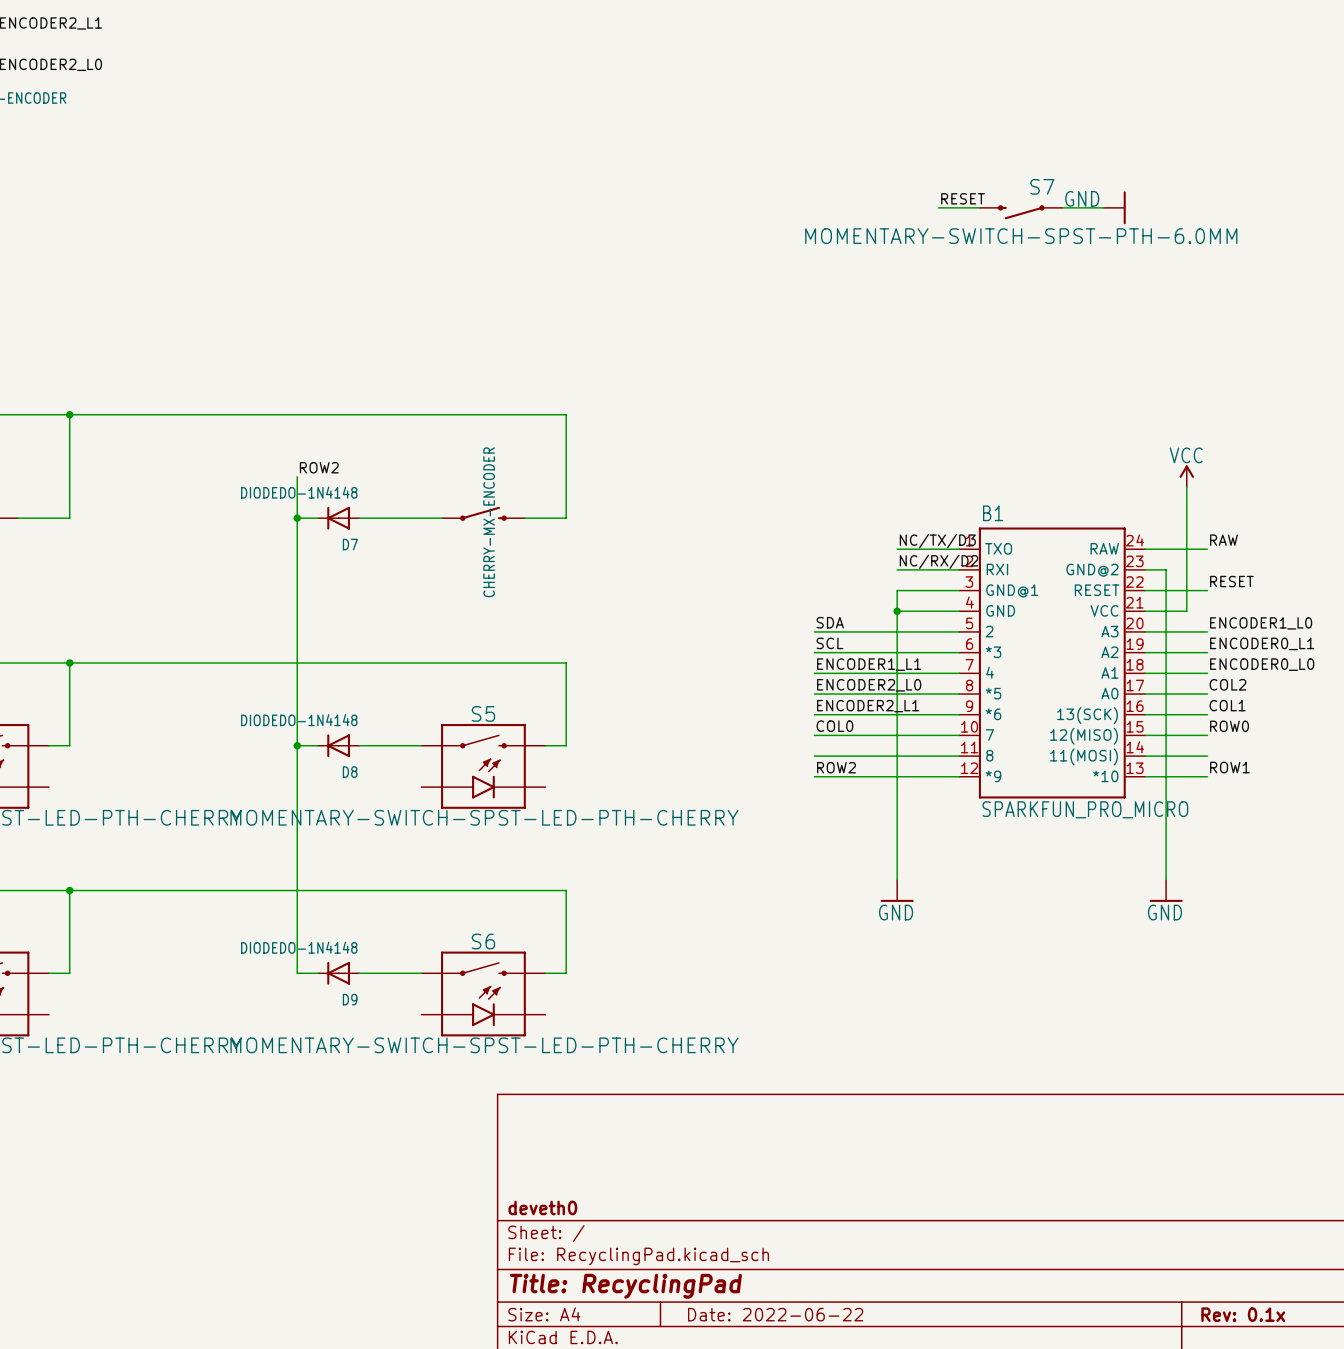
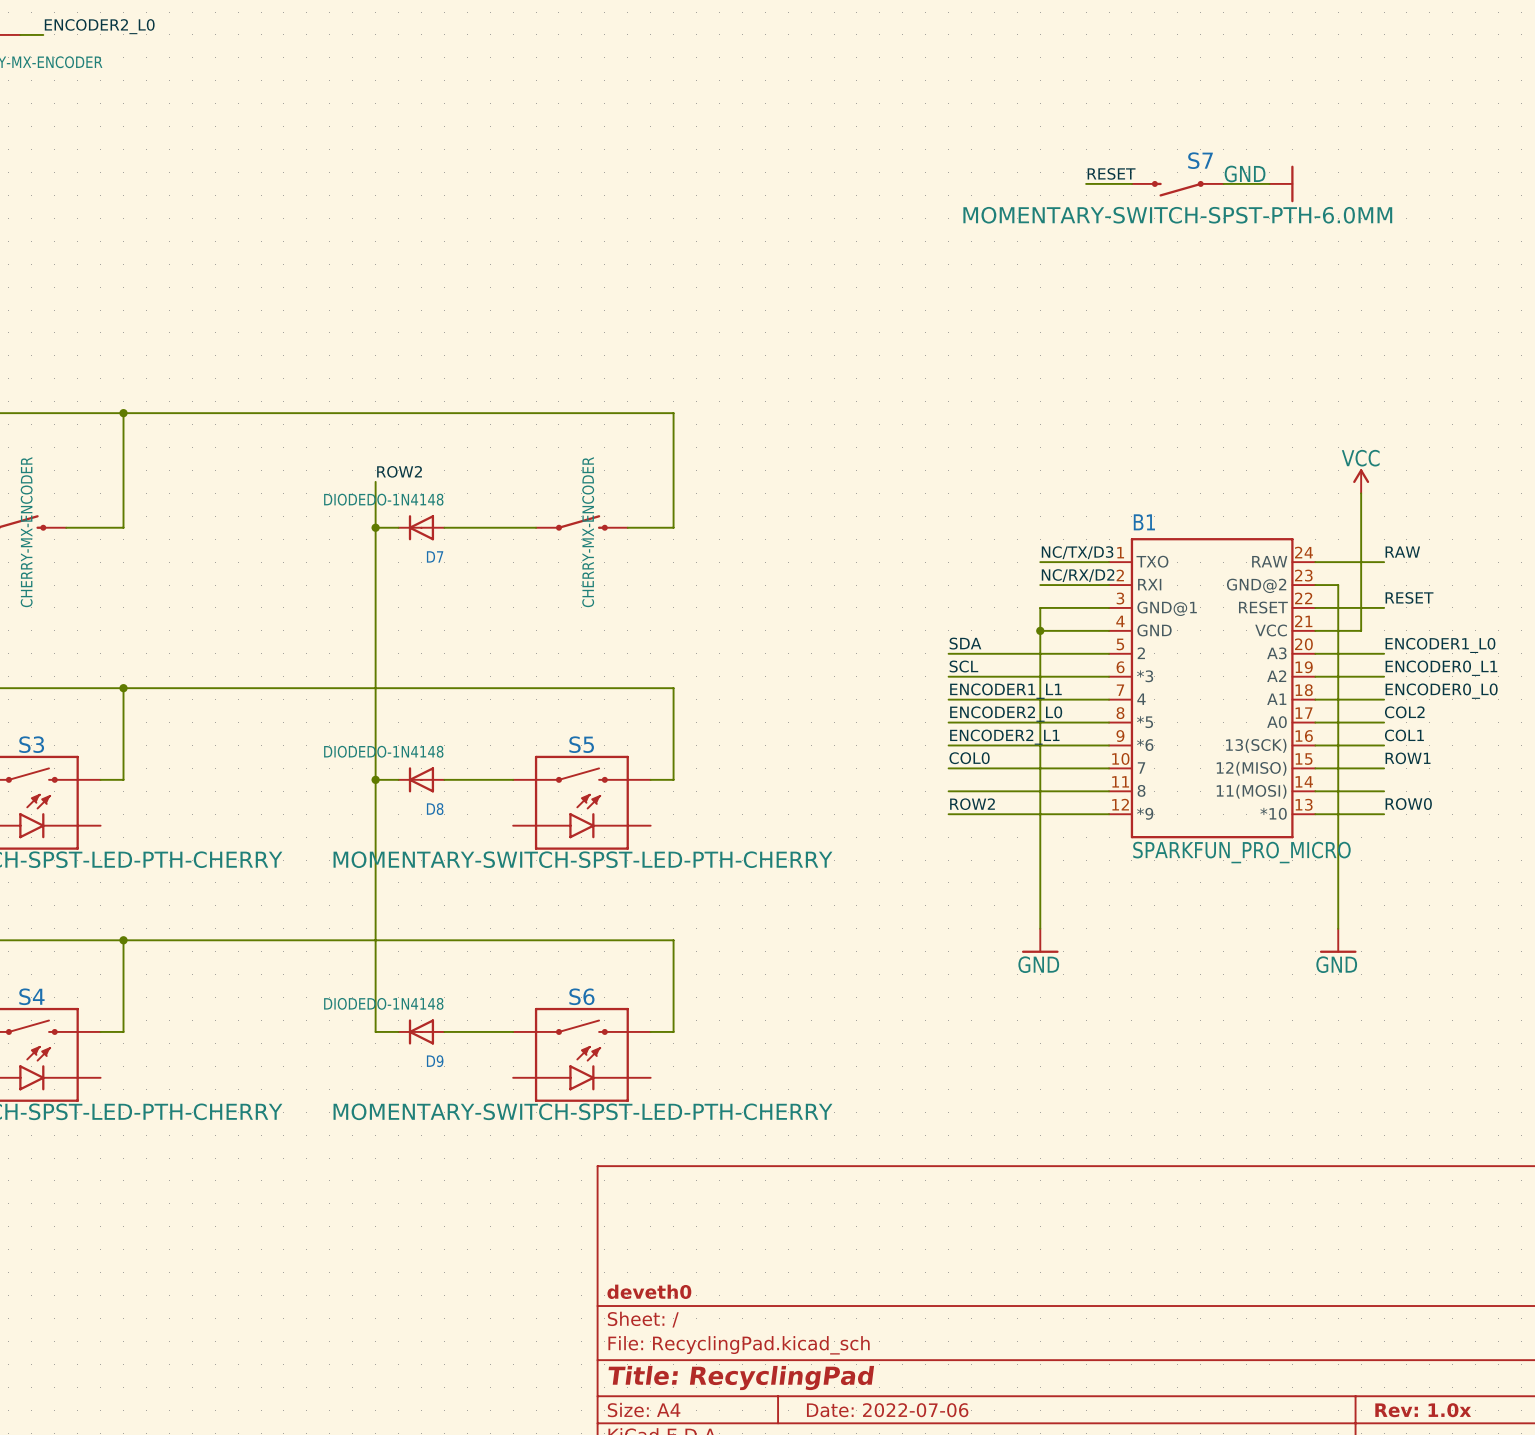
label: ROW0 (1229, 726) -> ROW1 (1408, 758)
label: ROW1 (1229, 767) -> ROW0 (1408, 804)
title block: Date: 2022-06-22 (775, 1314) -> Date: 2022-07-06 (887, 1410)
title block: Rev: 0.1x (1243, 1314) -> Rev: 1.0x (1423, 1410)

